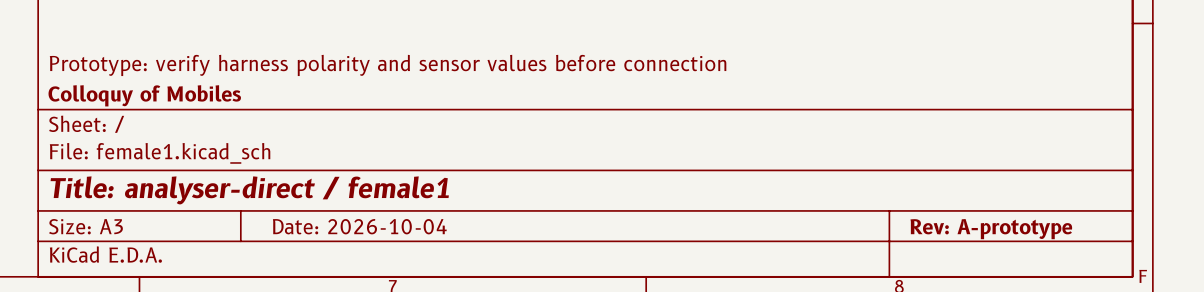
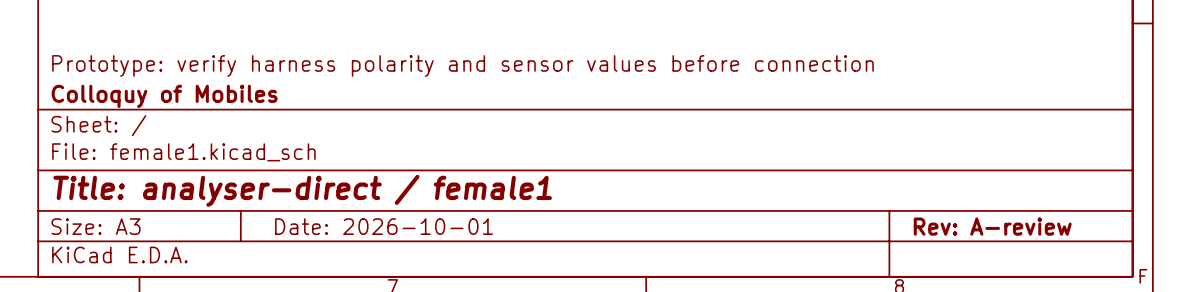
title block: Date: 2026-10-04 (359, 226) -> Date: 2026-10-01 (384, 226)
title block: Rev: A-prototype (991, 229) -> Rev: A-review (992, 226)

